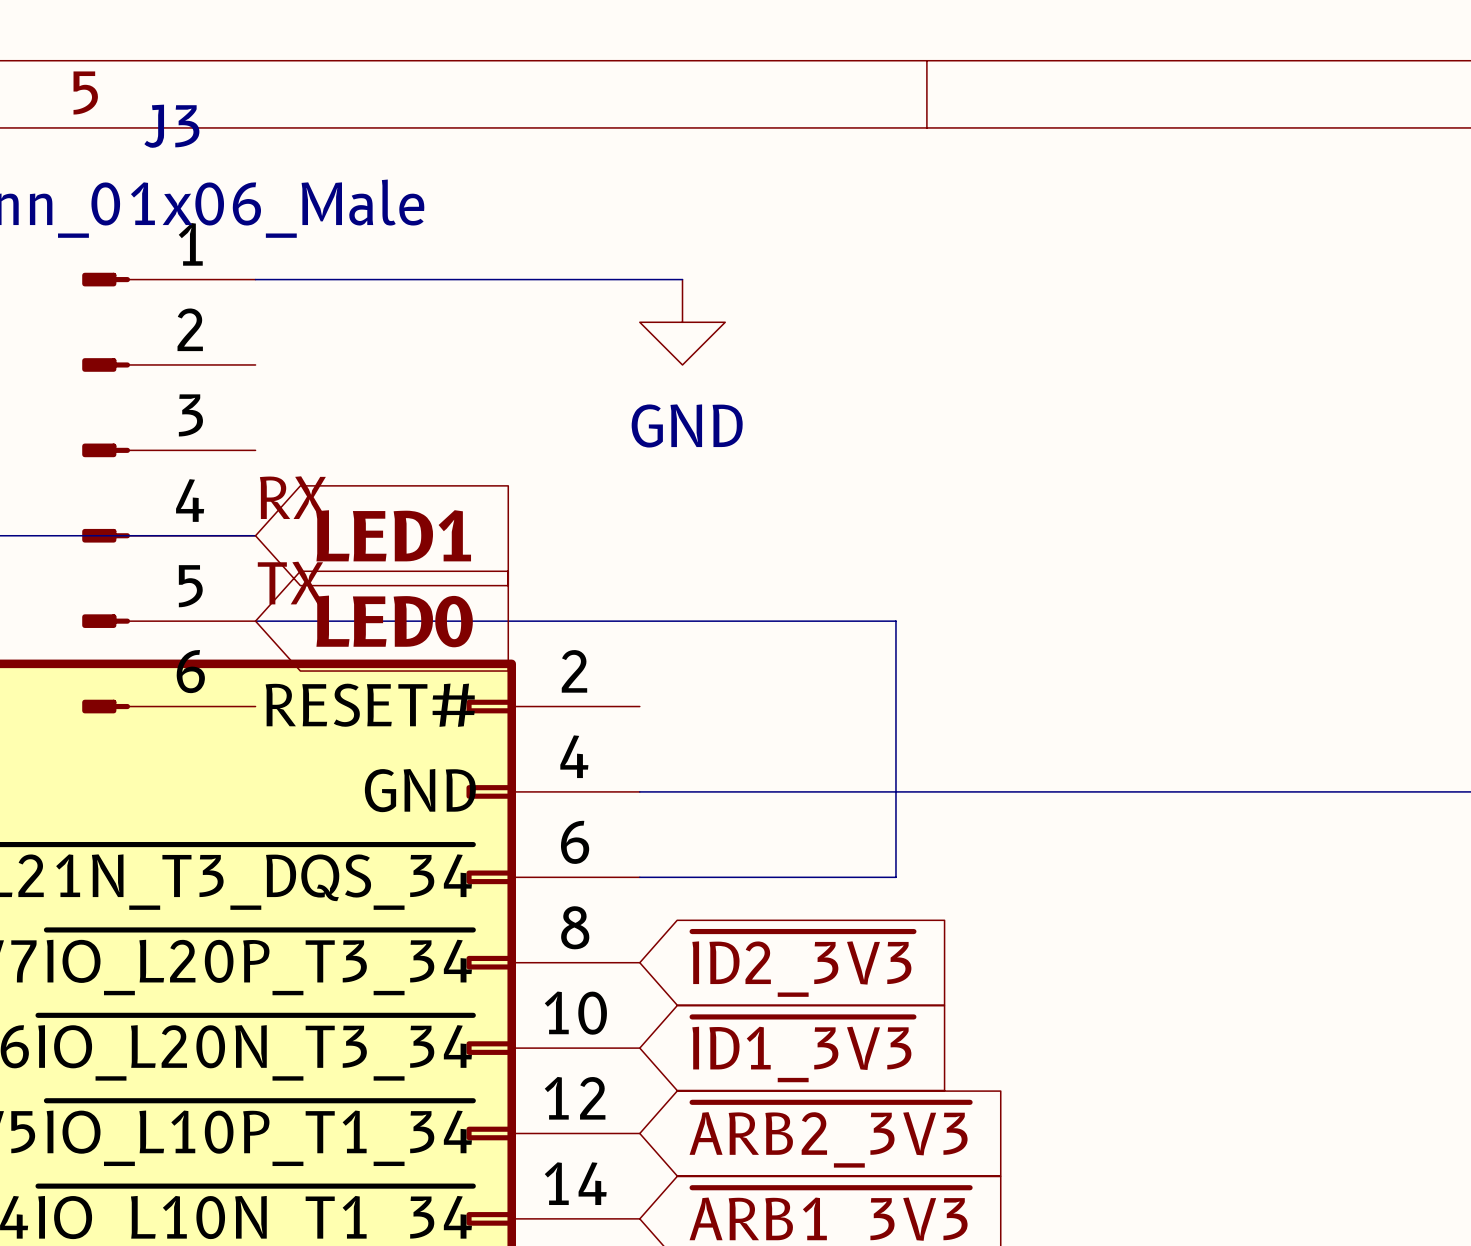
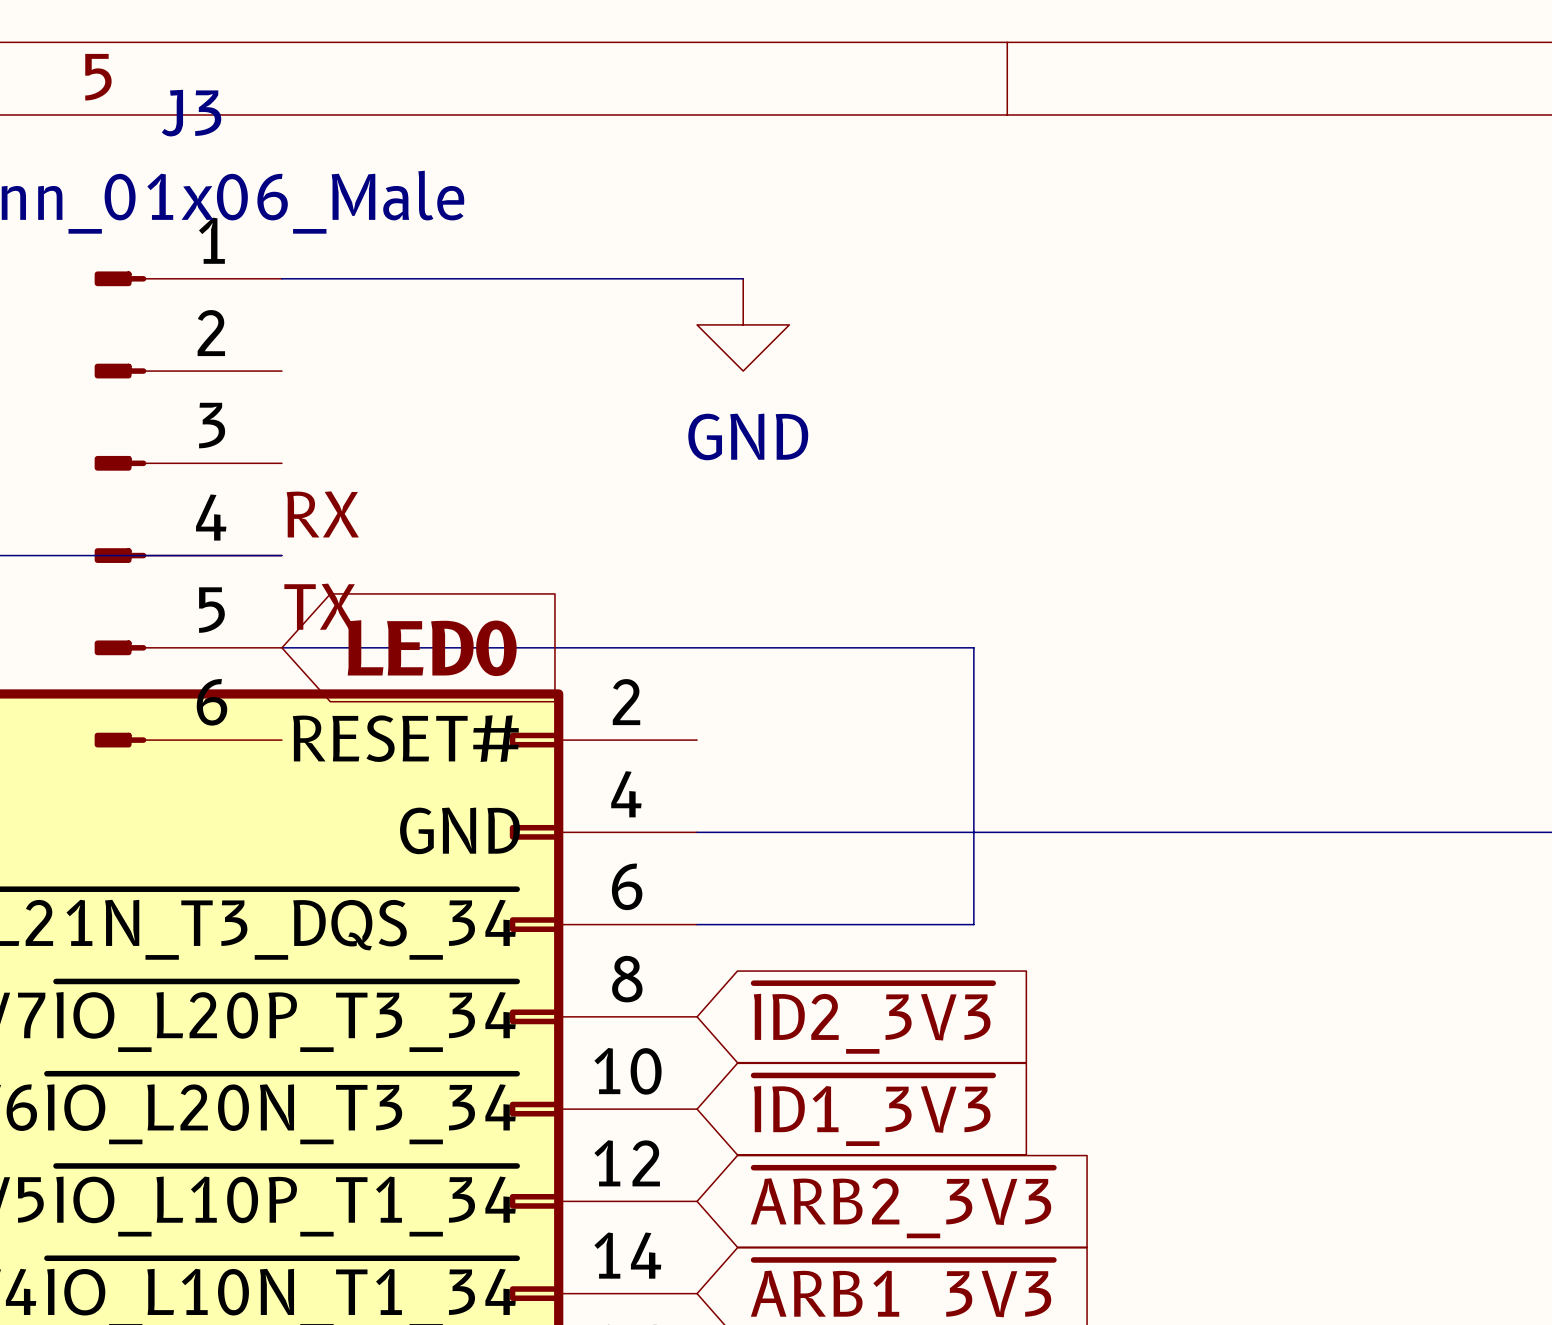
global label: LED1 (393, 535) -> none

